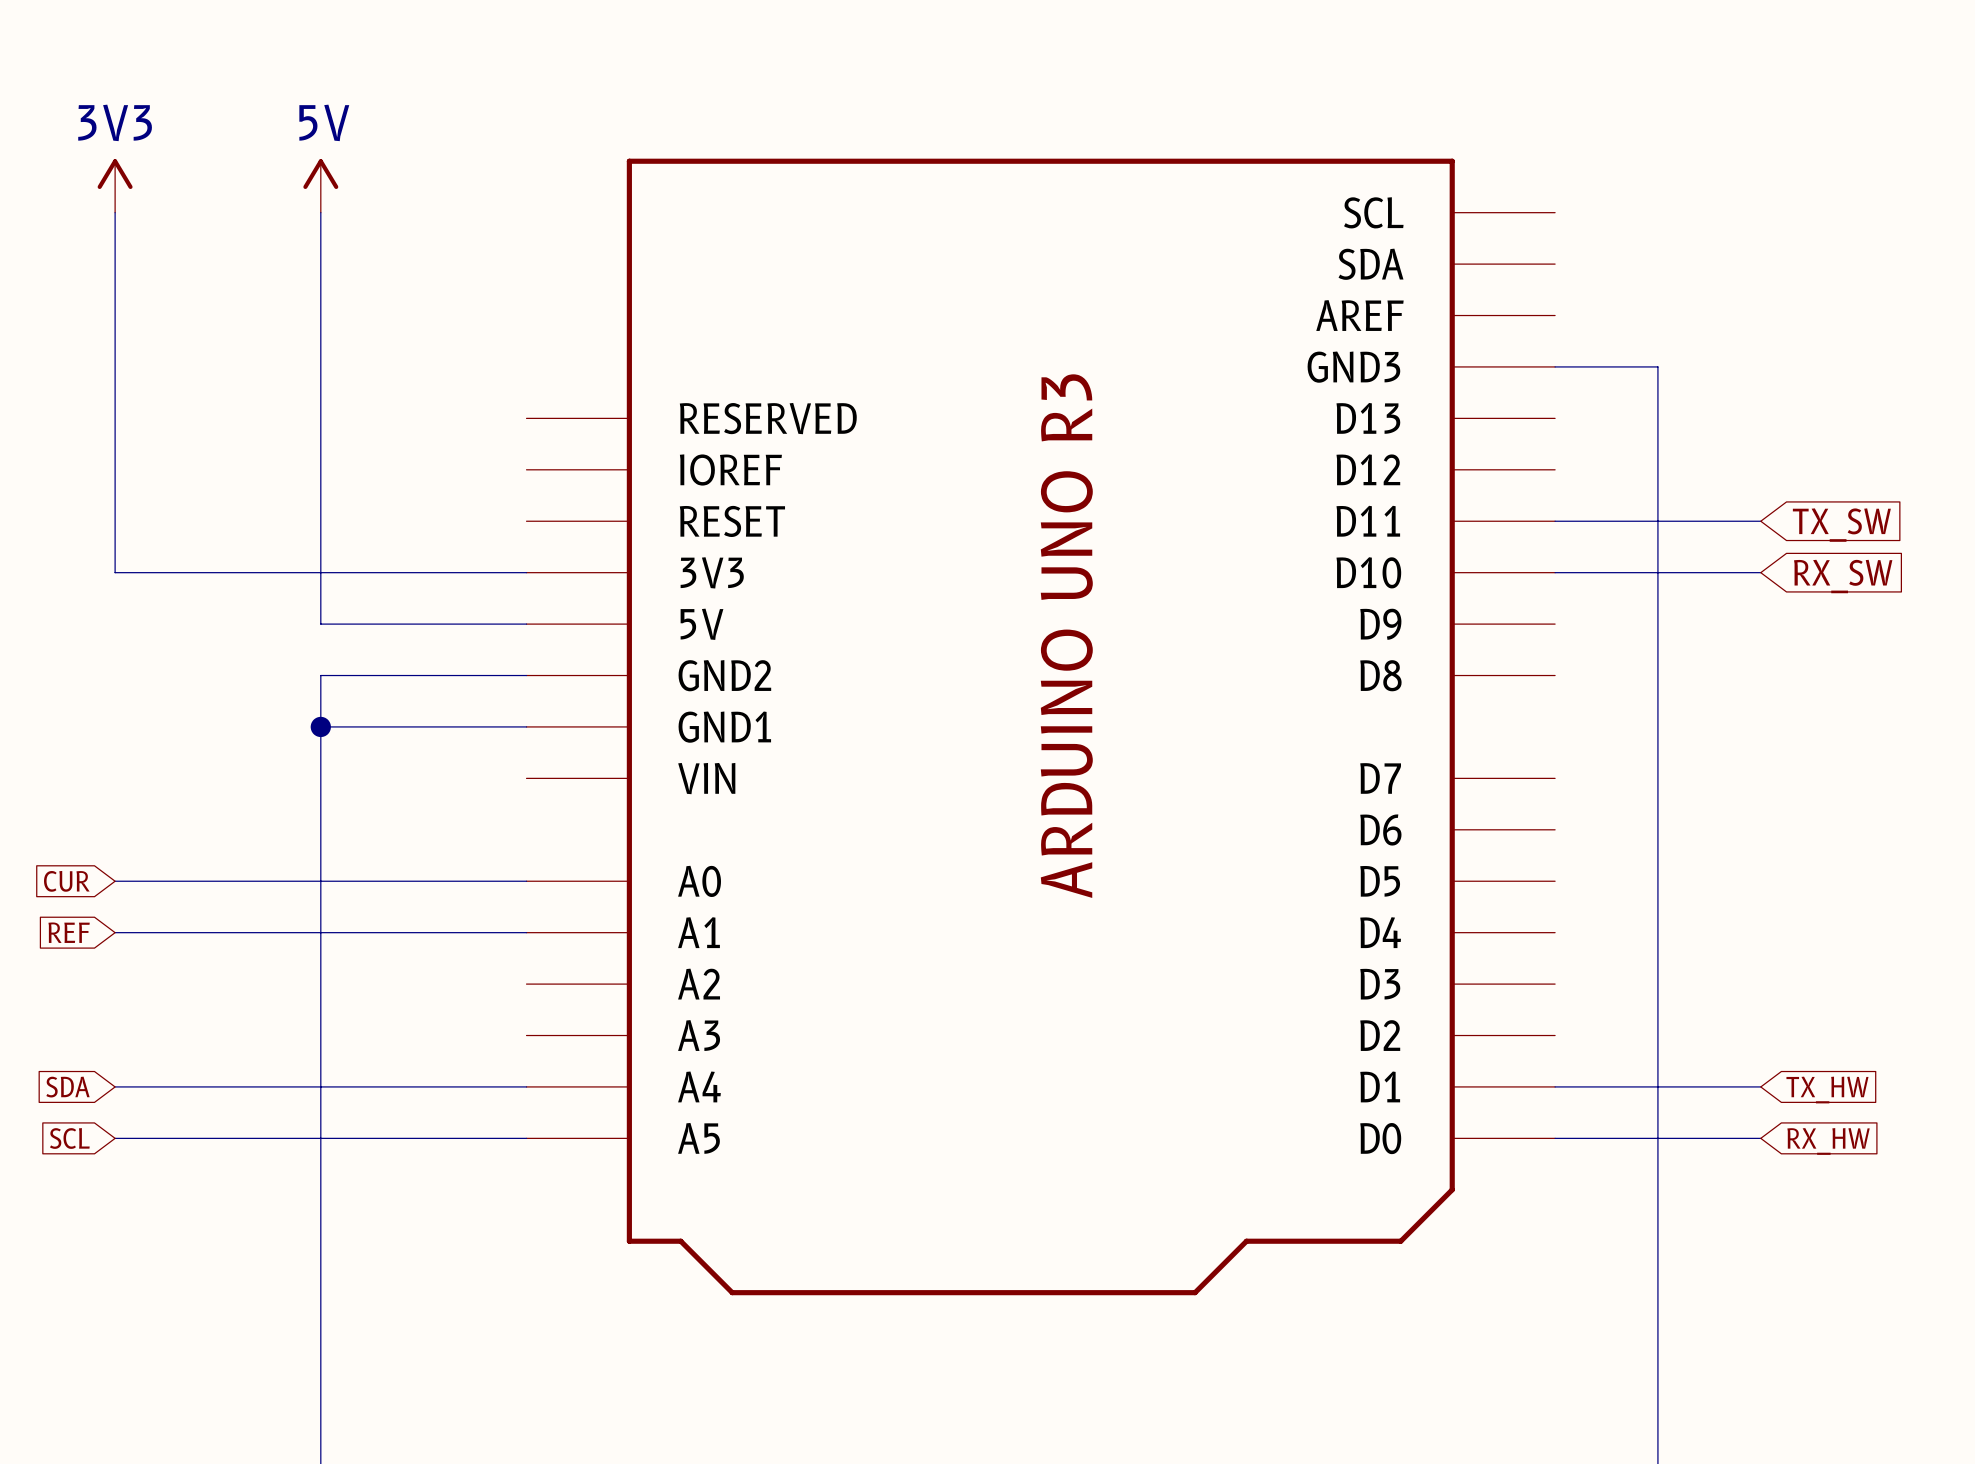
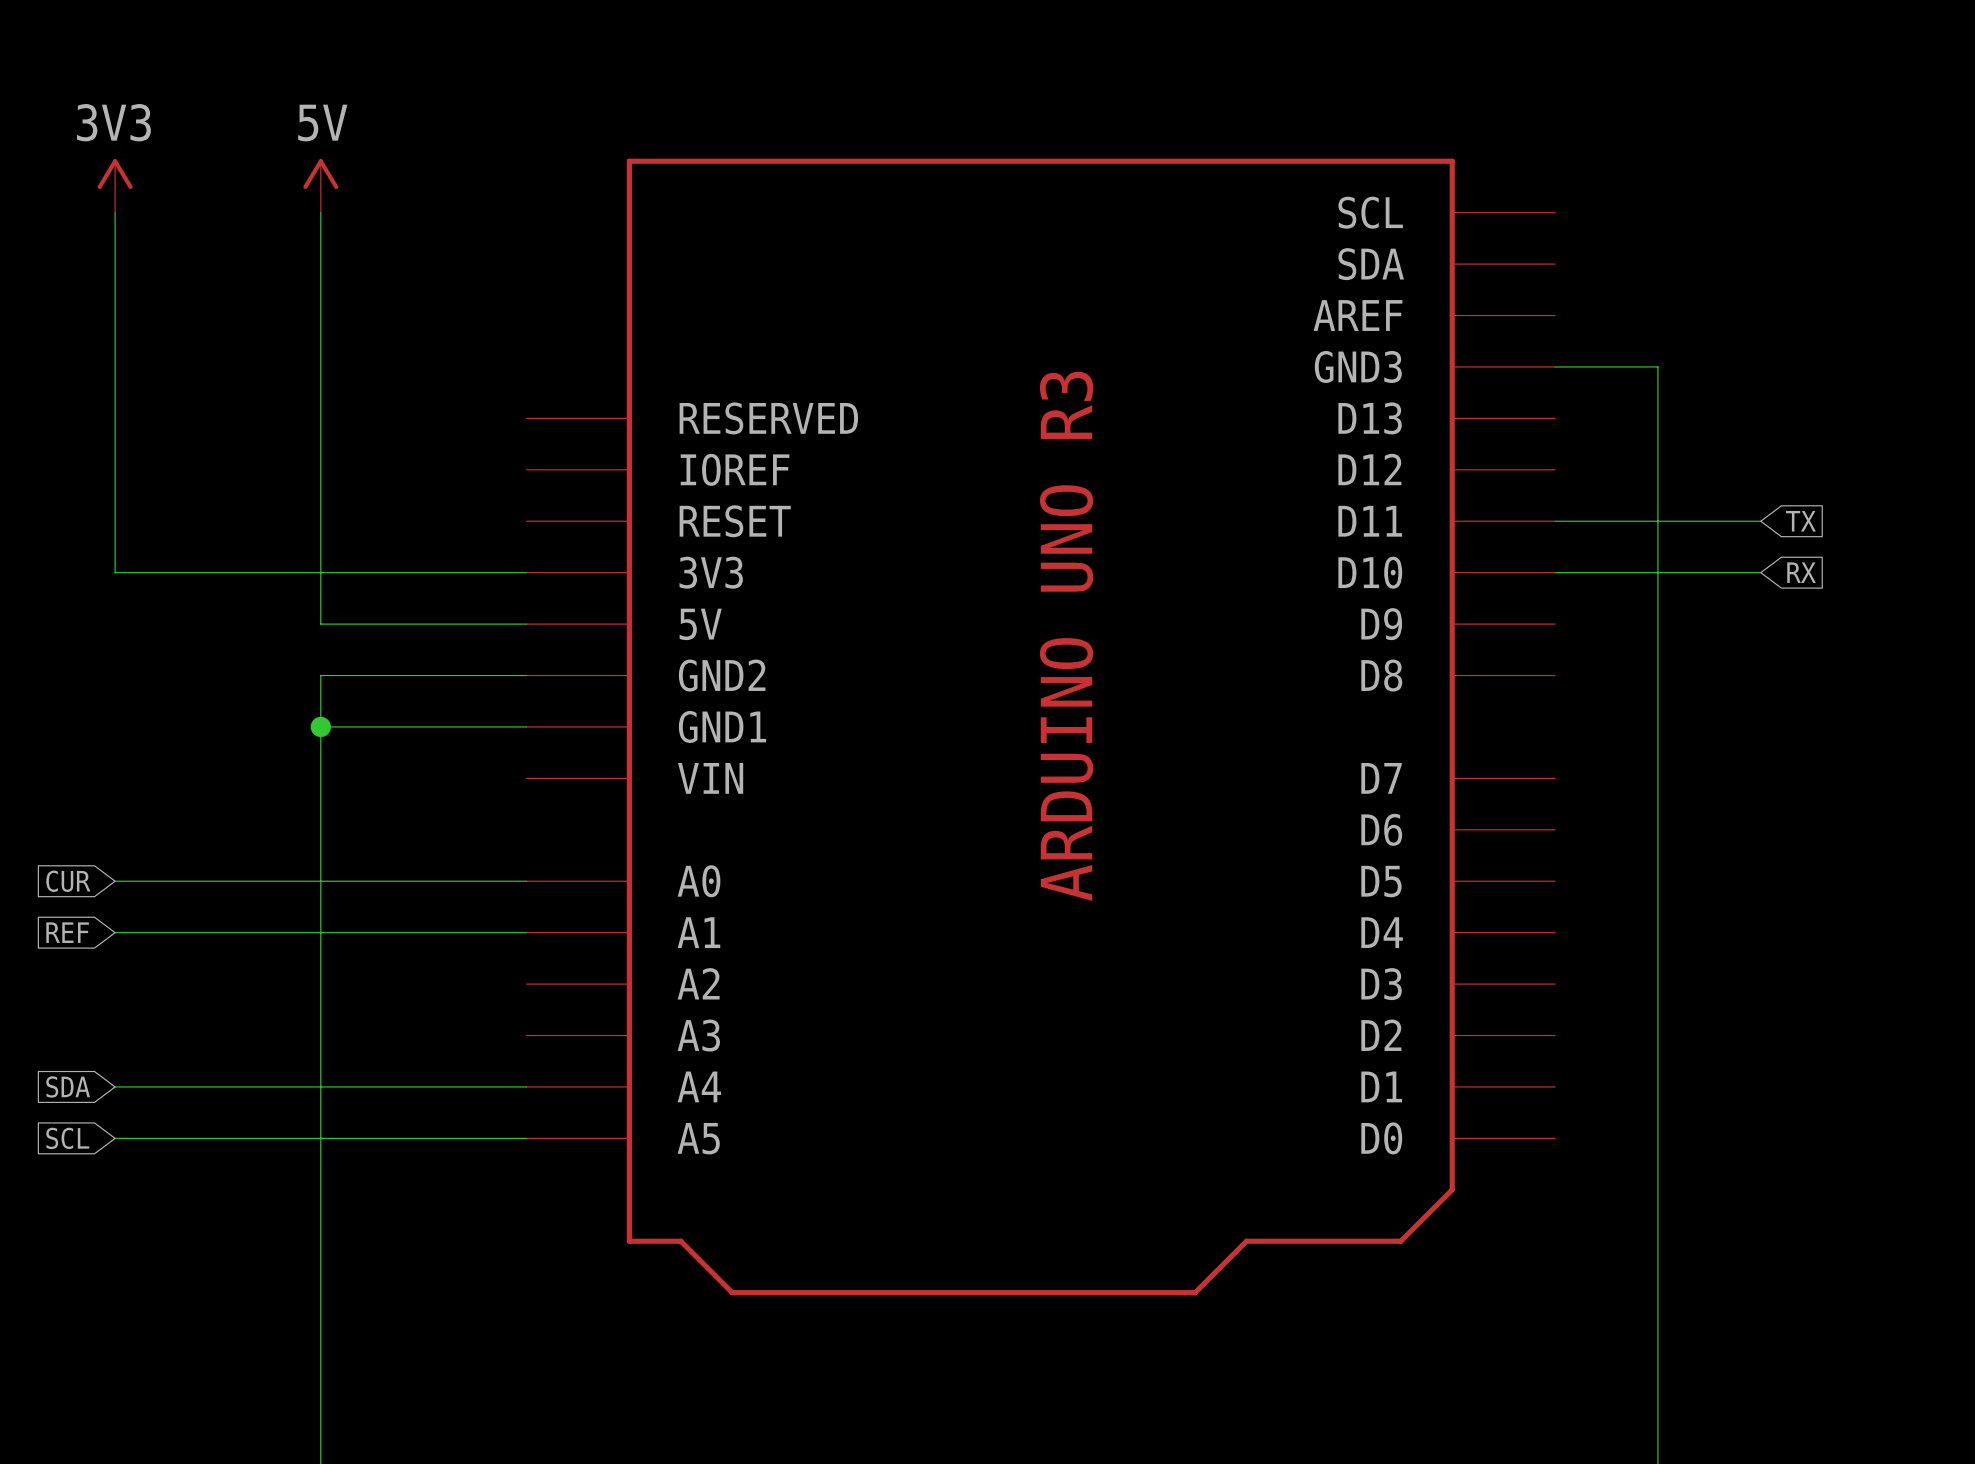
global label: TX_SW (1841, 525) -> TX (1800, 521)
global label: RX_SW (1843, 576) -> RX (1801, 572)
wire: (1555, 1086) (1760, 1086) -> none
global label: TX_HW (1827, 1090) -> none
wire: (1555, 1138) (1760, 1138) -> none
global label: RX_HW (1828, 1141) -> none

